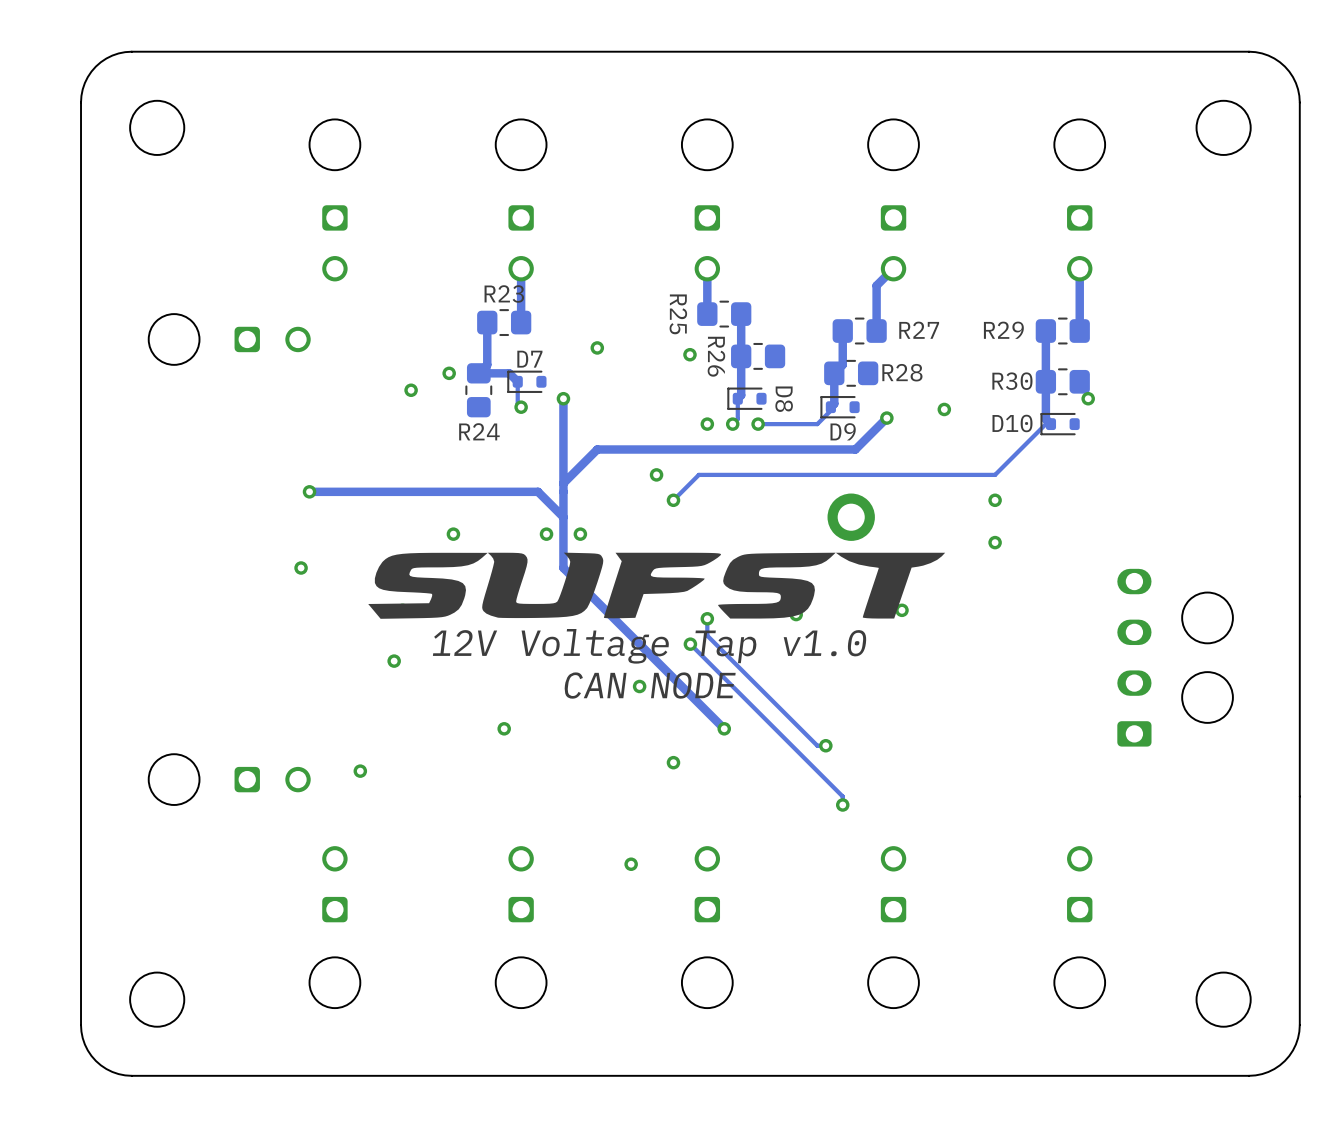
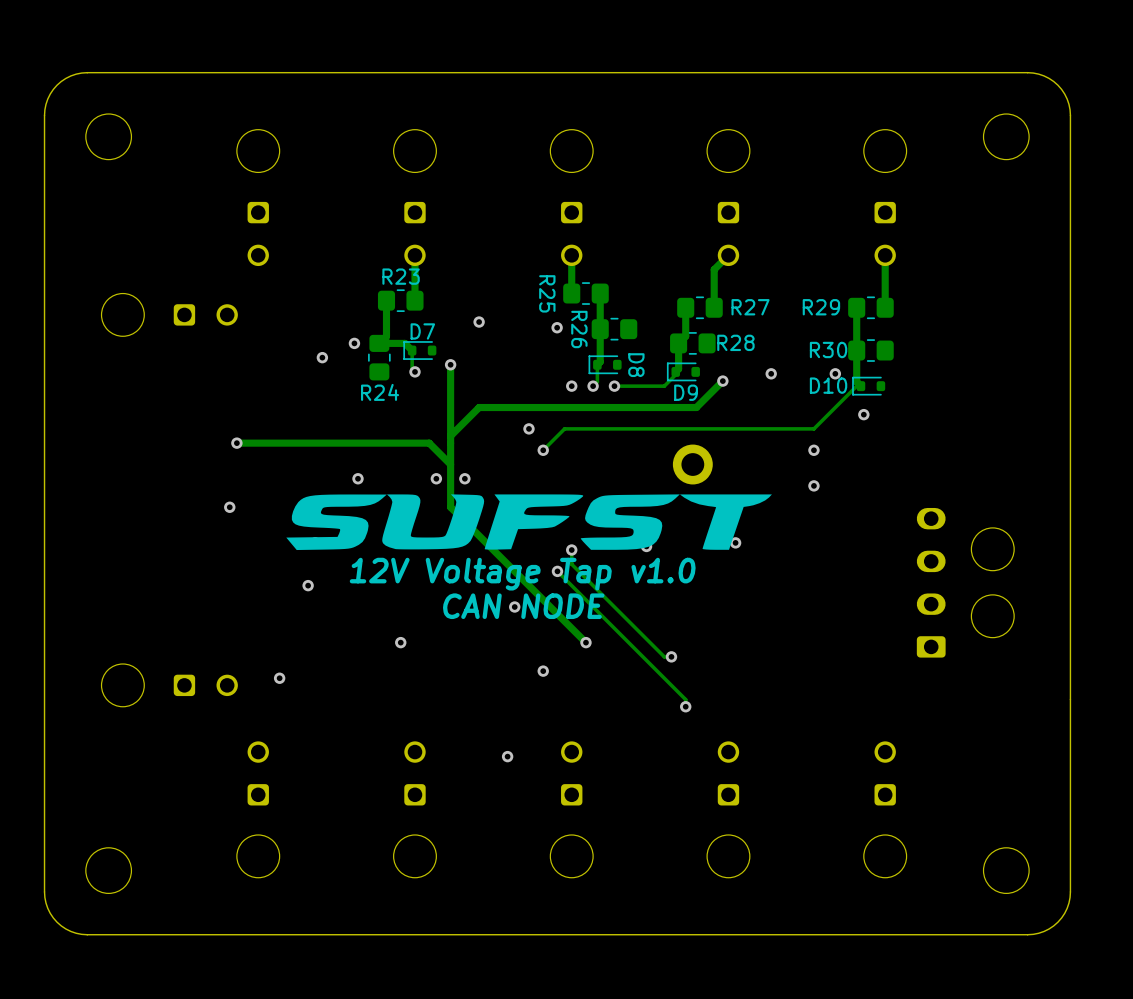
via: (1088, 398) -> none
via: none -> (835, 373)
via: none -> (863, 414)

